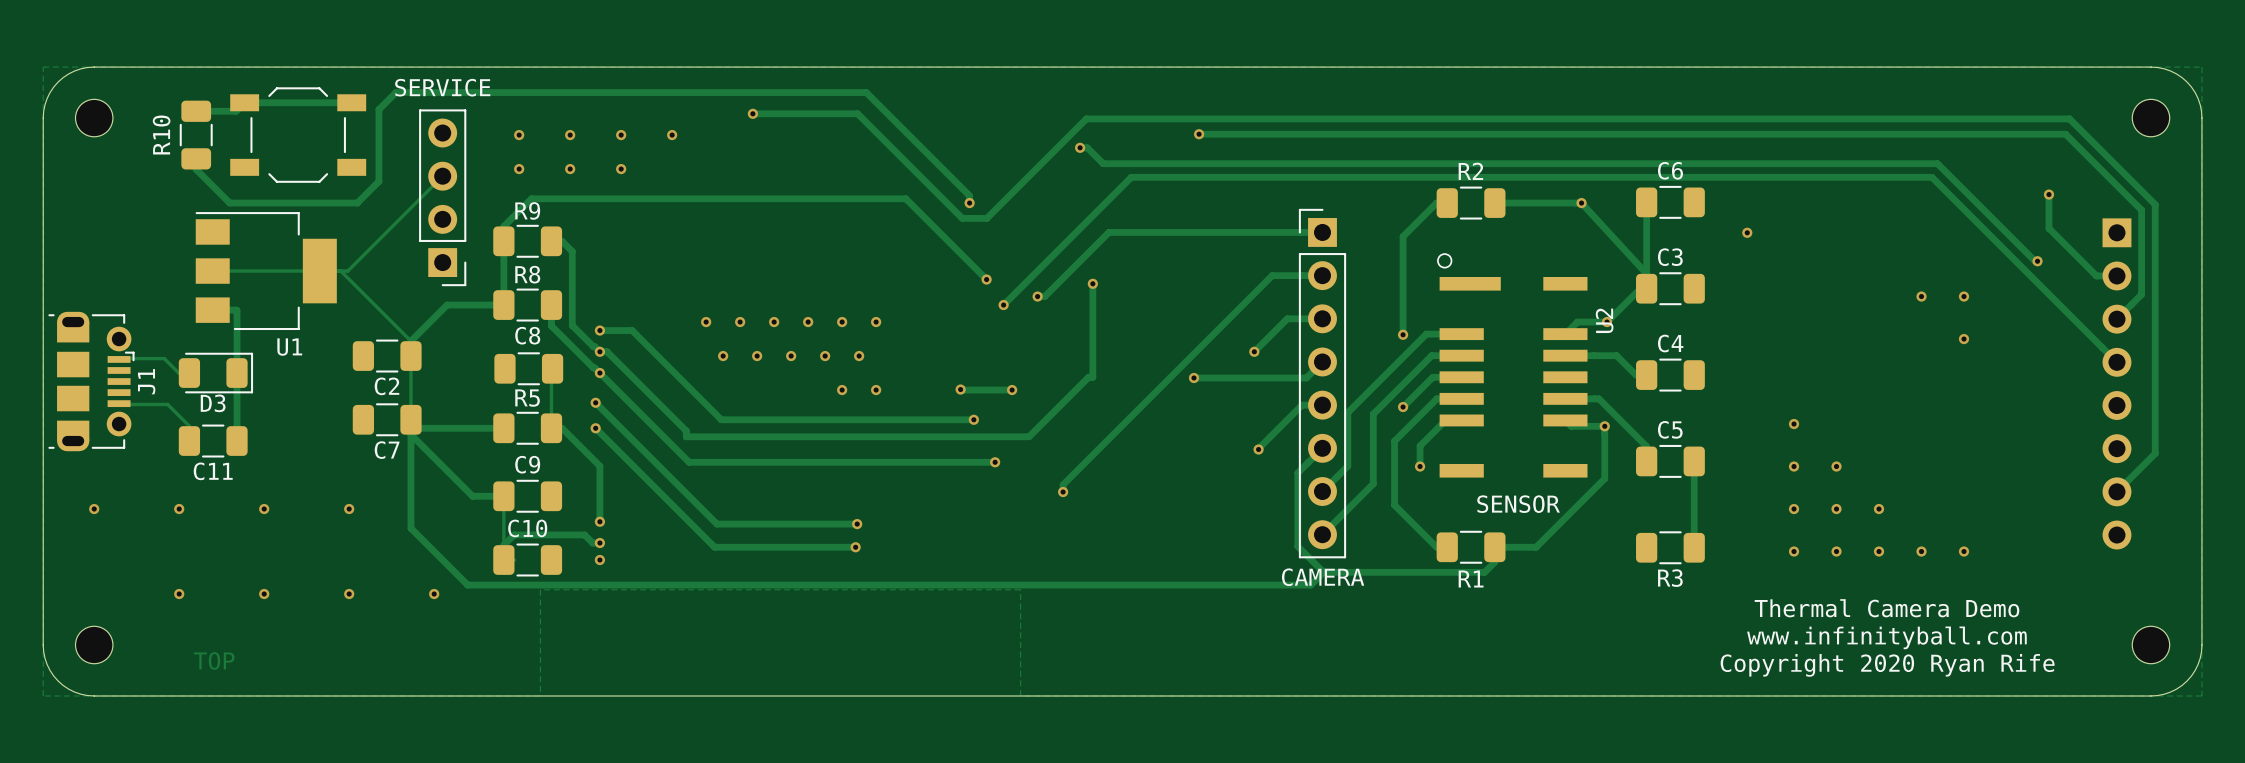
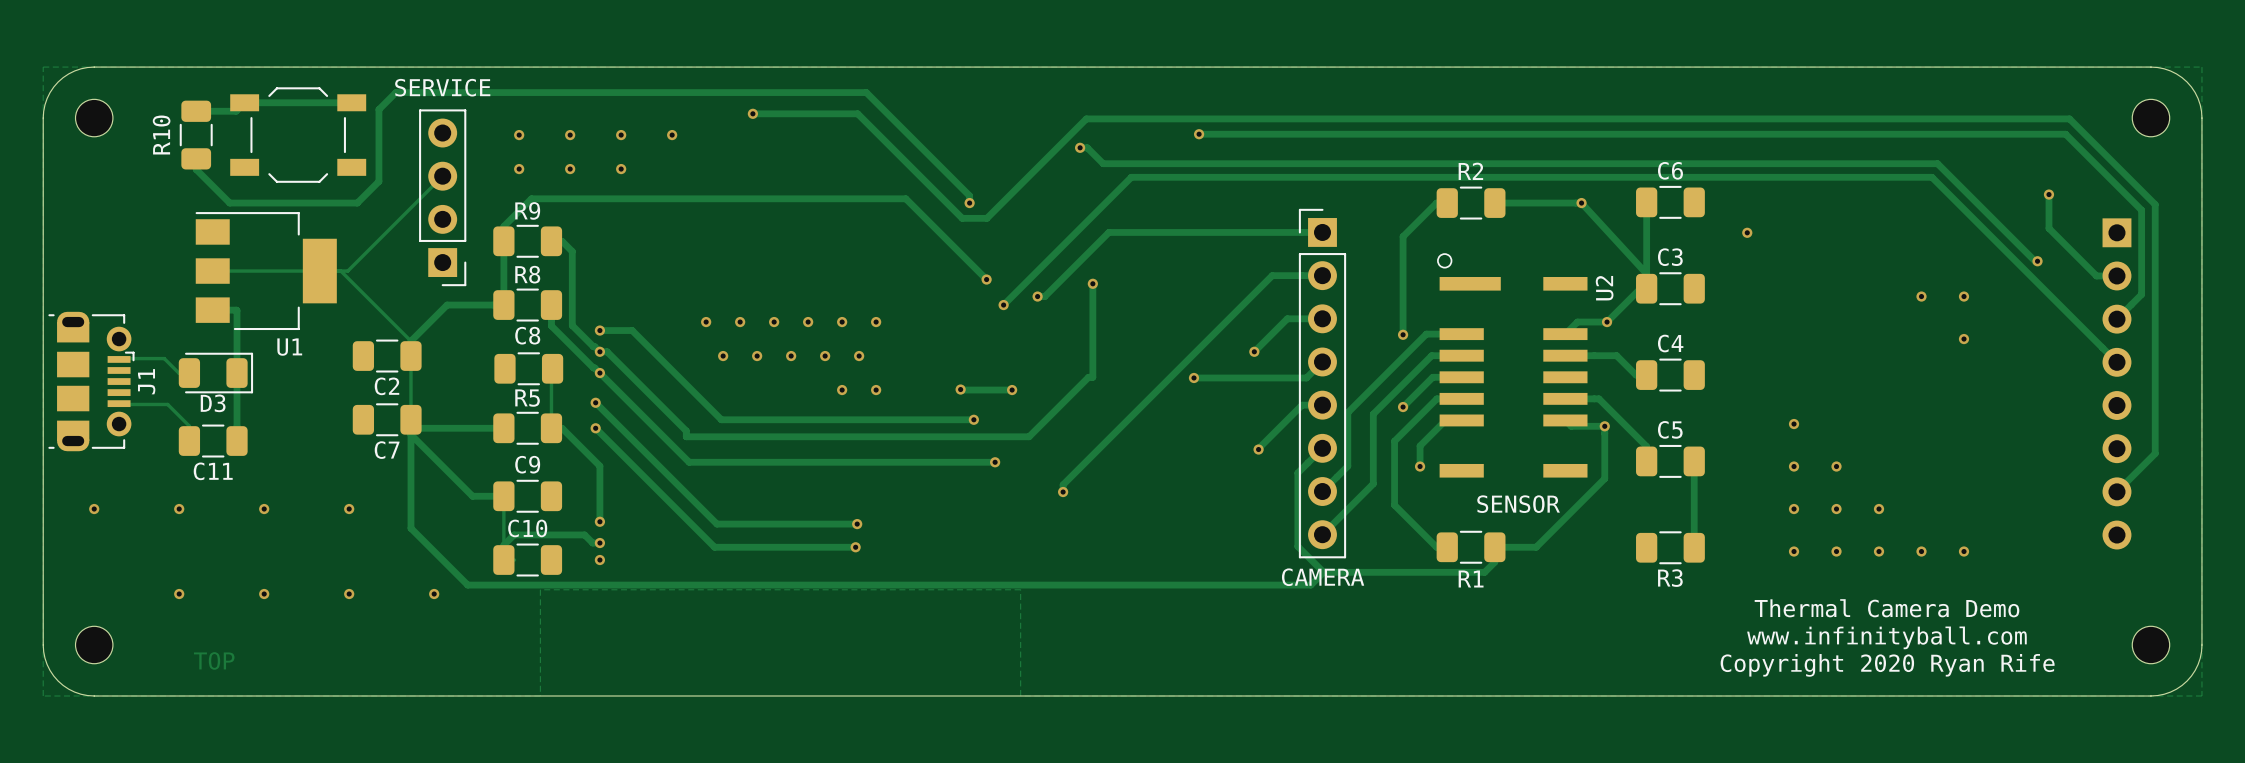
U2 name position: U2 (1604, 320) -> U2 (1604, 288)

